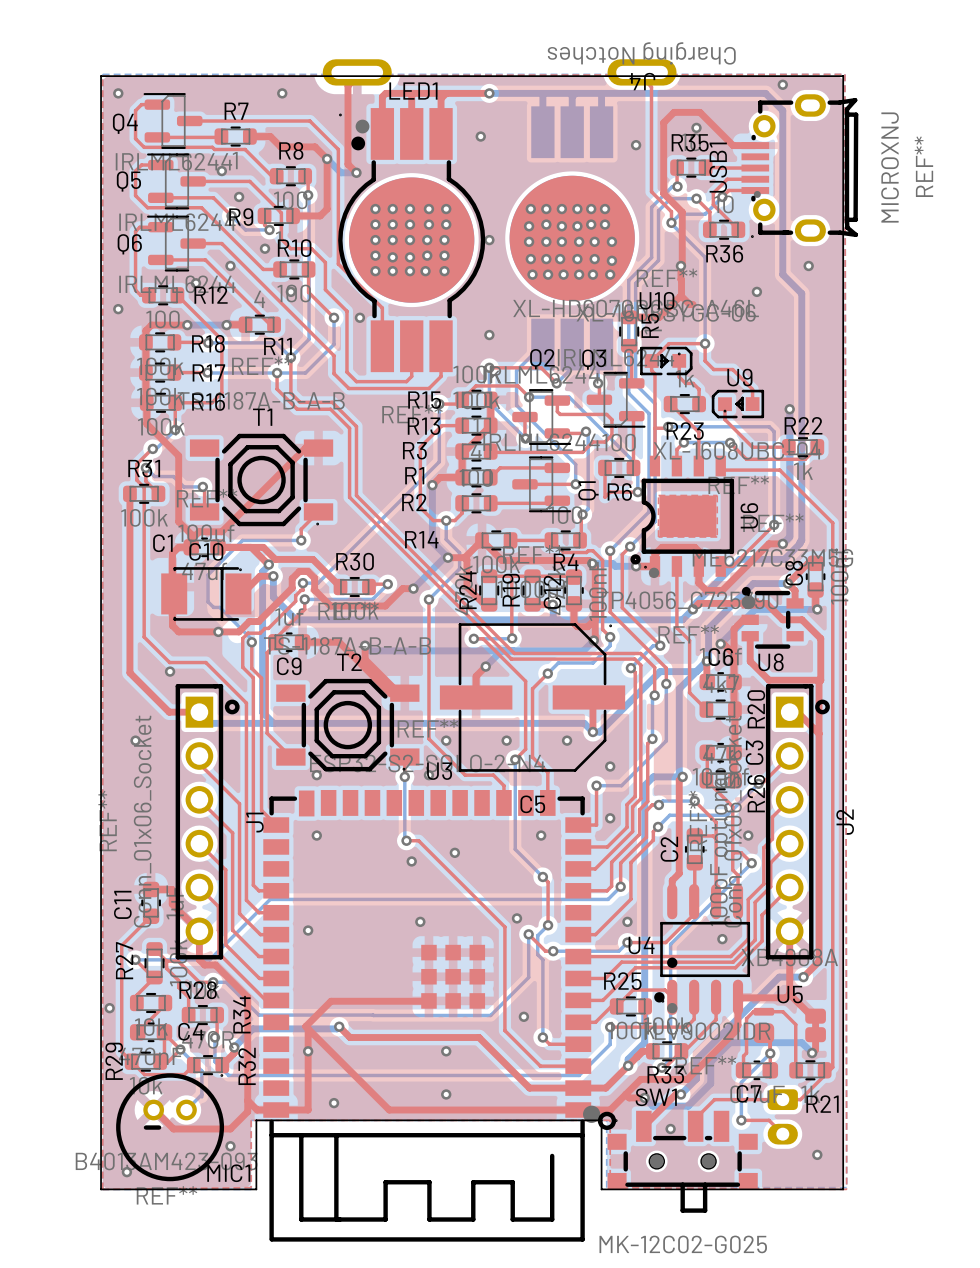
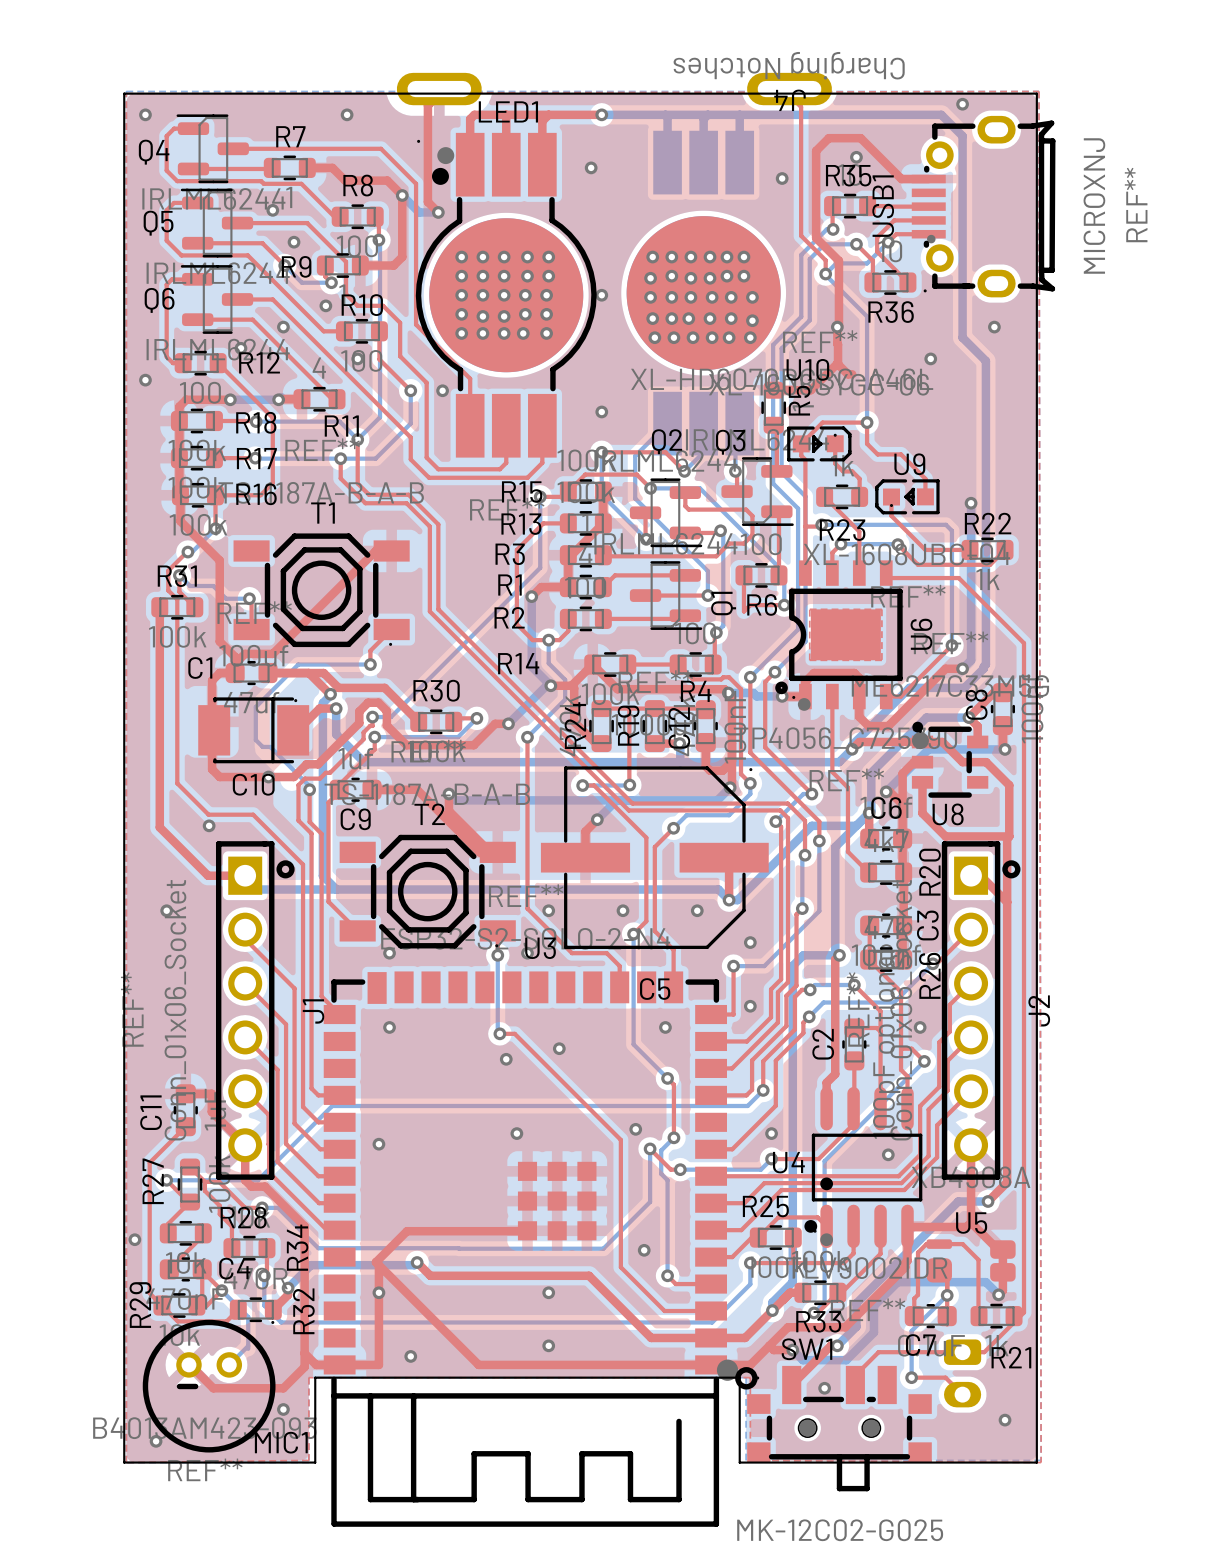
C10 name position: C10 (206, 551) -> C10 (253, 784)

